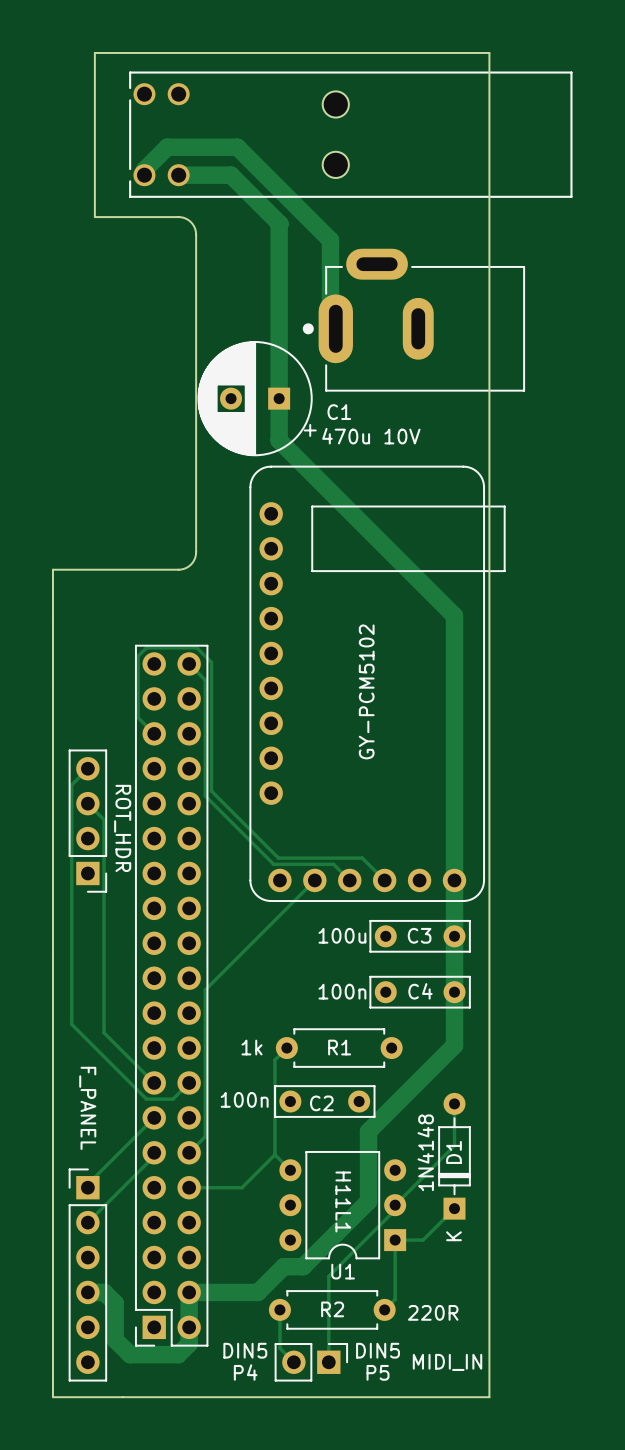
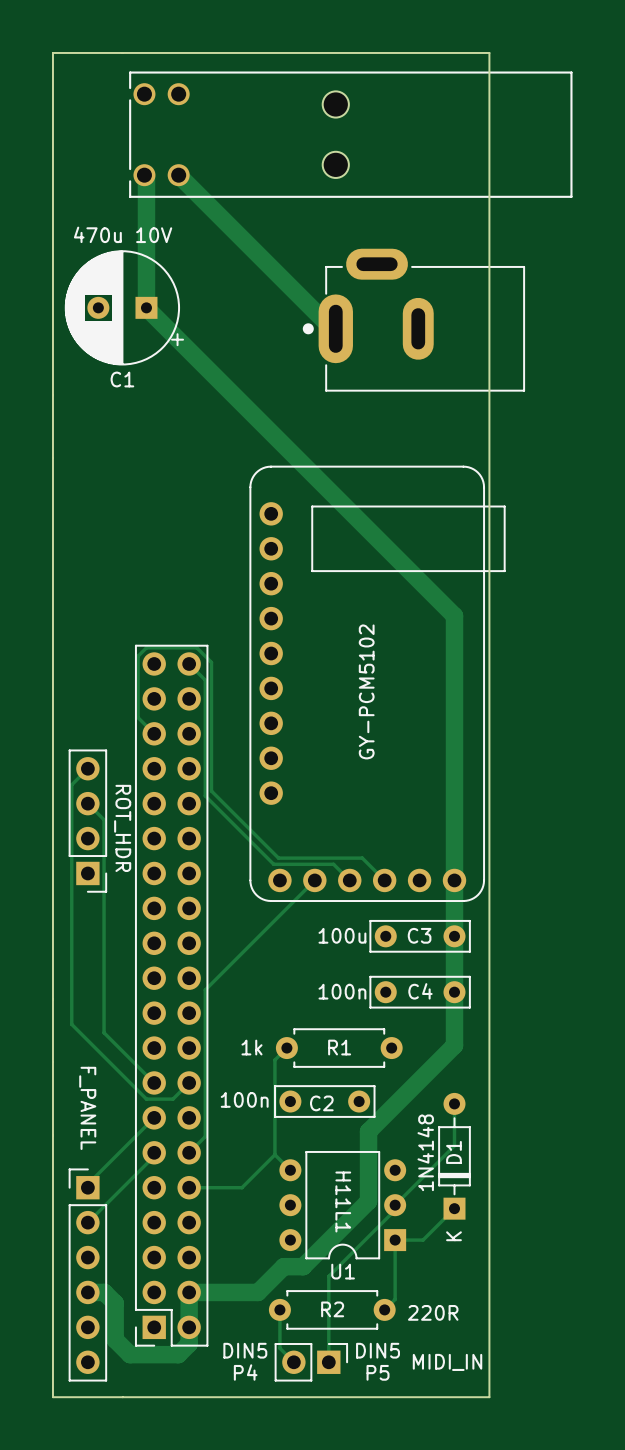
board edge: (94, 52) (94, 217) (180, 217) (189, 220) (195, 230) (195, 554) (191, 564) (180, 569) (52, 569) -> (94, 52) (52, 52) (52, 569)
track: (144, 175) (144, 170) (167, 147) (237, 147) (330, 240) (330, 323) (335, 328) -> none
track: (178, 175) (231, 175) (279, 224) (279, 440) -> (146, 177) (146, 307) (279, 440)
track: none -> (178, 175) (332, 328)
C1 position: (257, 398) -> (124, 307)
C1 name position: C1 (339, 412) -> C1 (122, 379)
C1 value position: 470u 10V (371, 436) -> 470u 10V (123, 234)

